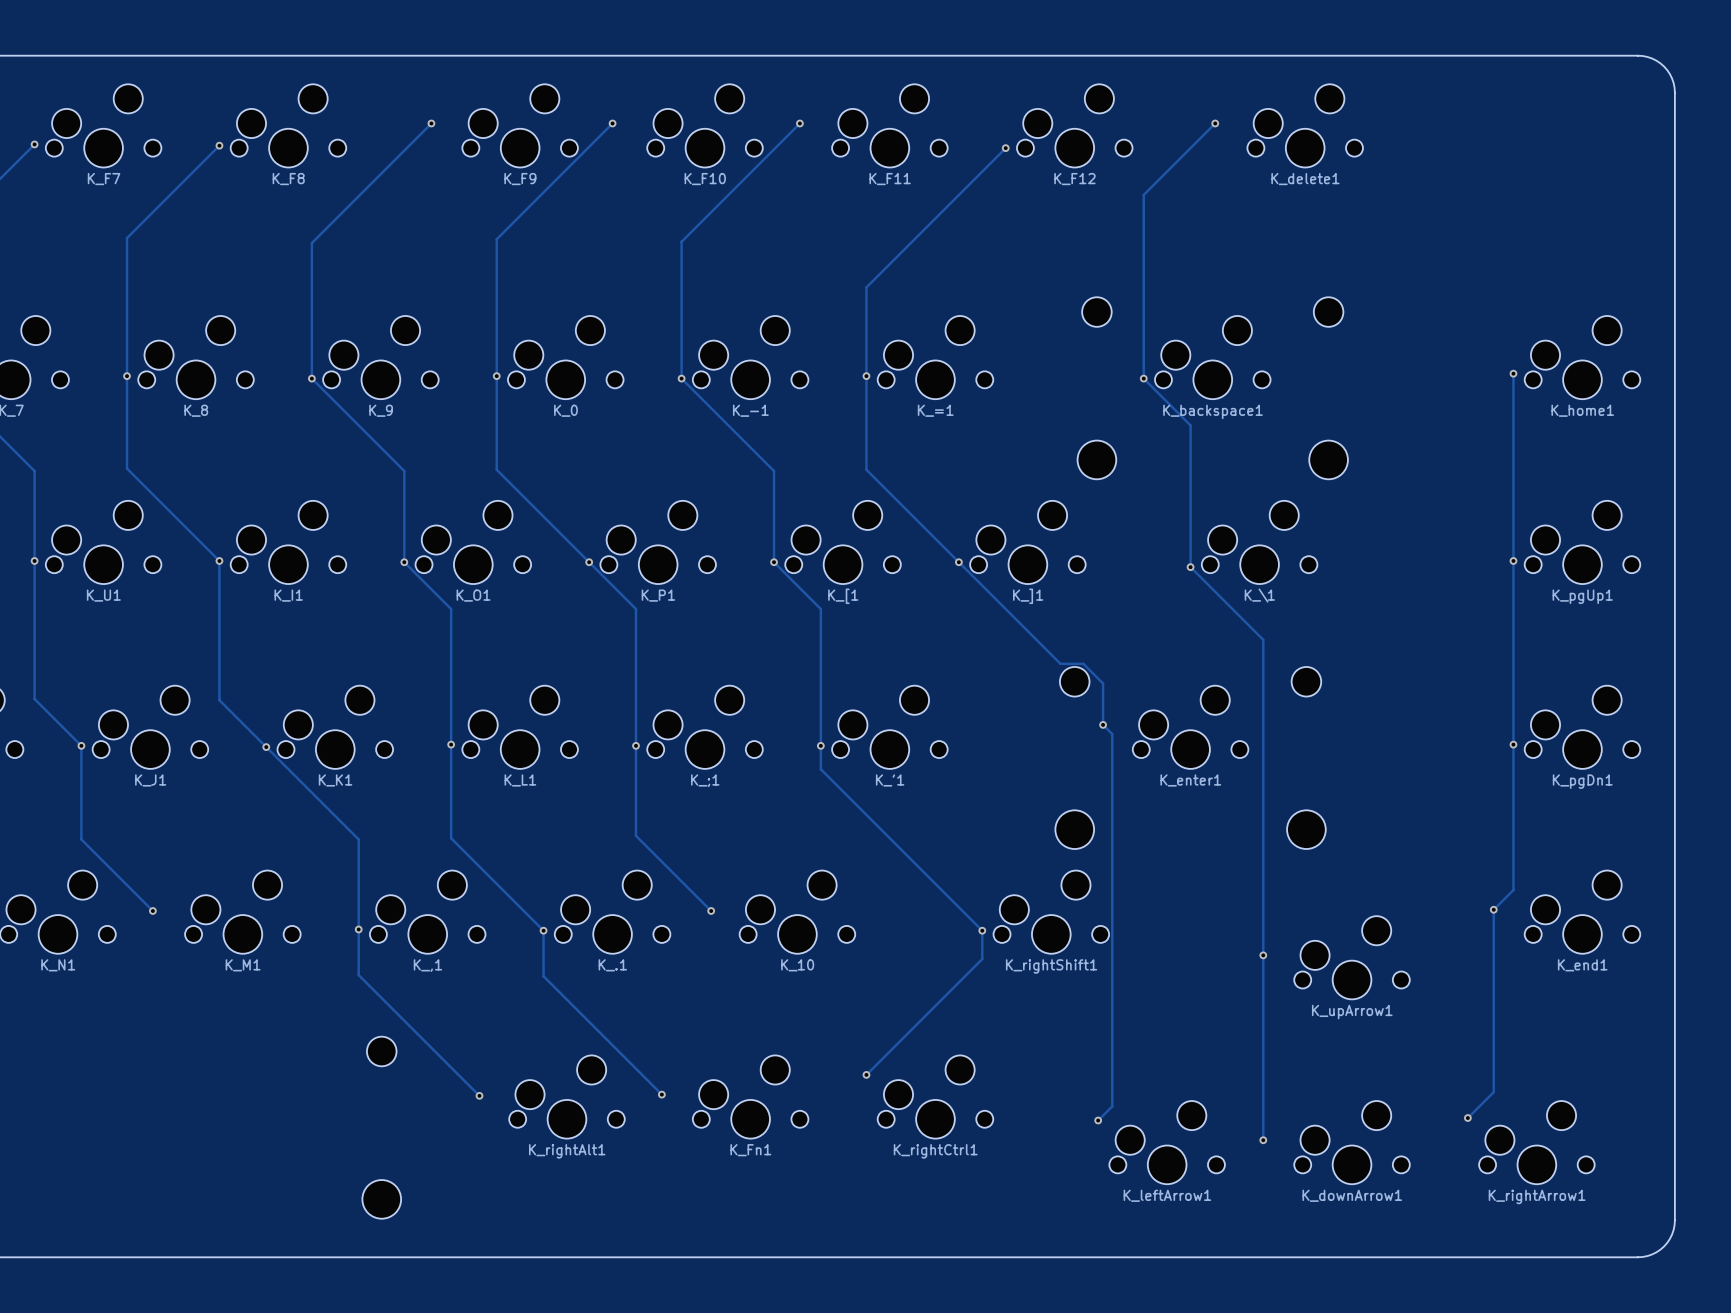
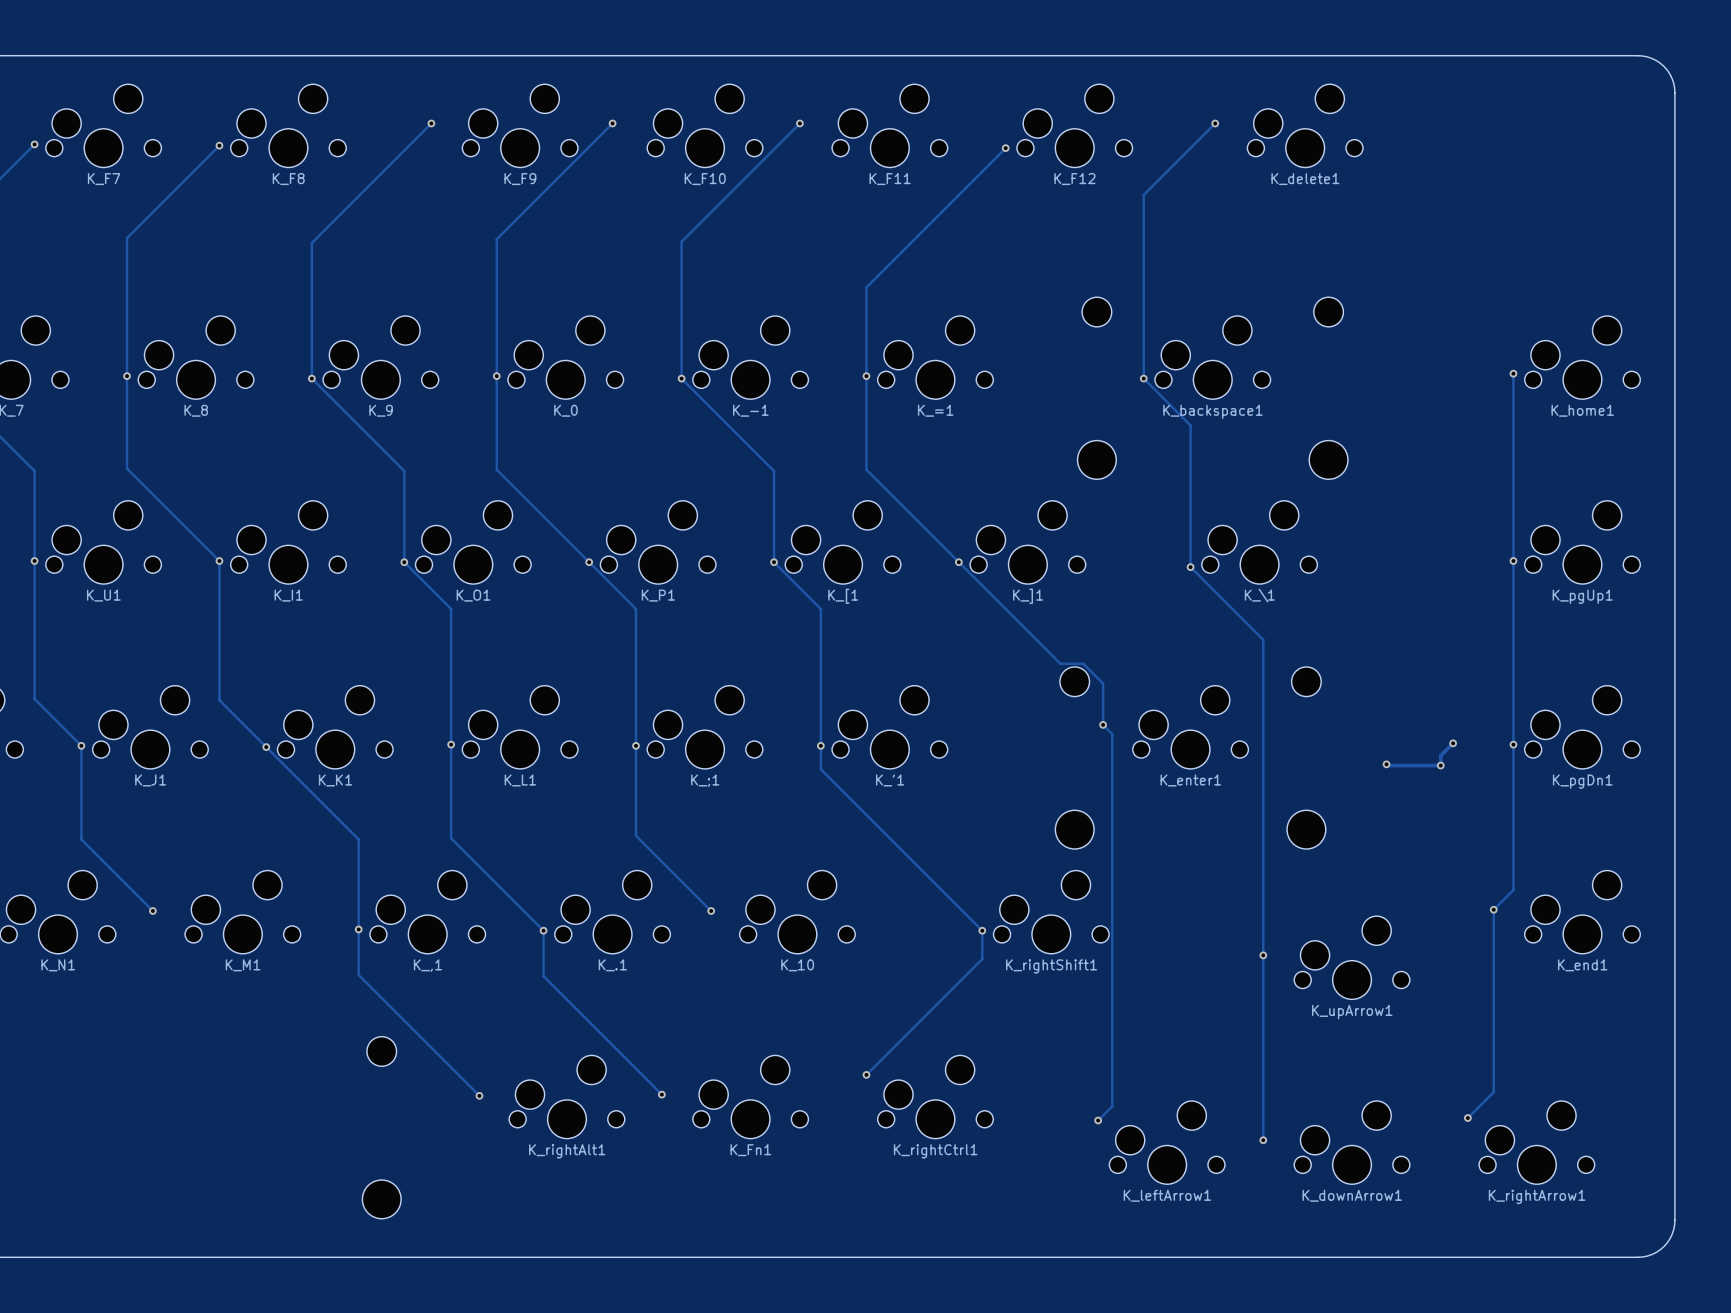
track: none -> (1453, 743) (1440, 755) (1440, 765) (1386, 764)
via: none -> (1453, 743)
via: none -> (1386, 764)
via: none -> (1440, 765)

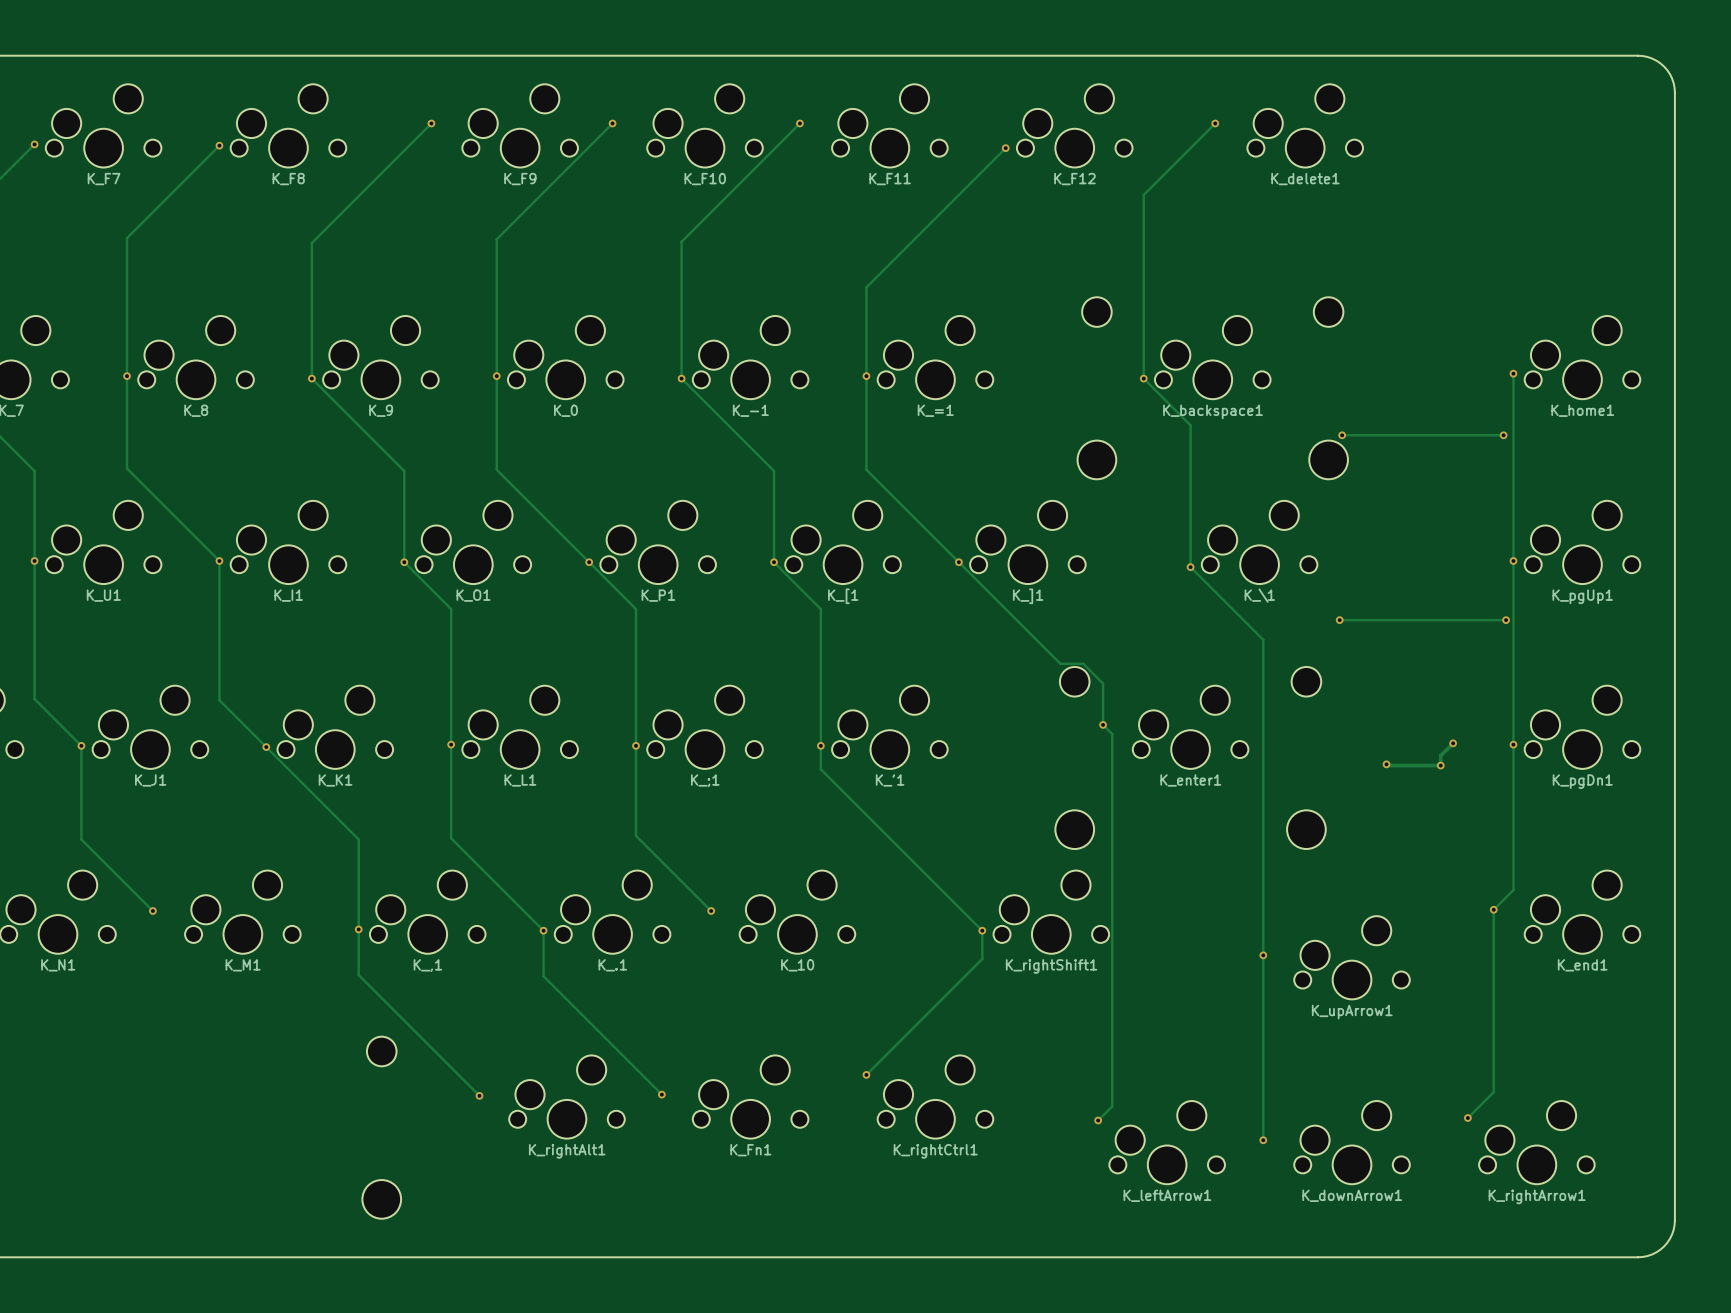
track: none -> (1342, 435) (1503, 435)
via: none -> (1342, 435)
via: none -> (1503, 435)
track: none -> (1339, 620) (1506, 620)
via: none -> (1339, 620)
via: none -> (1506, 620)

